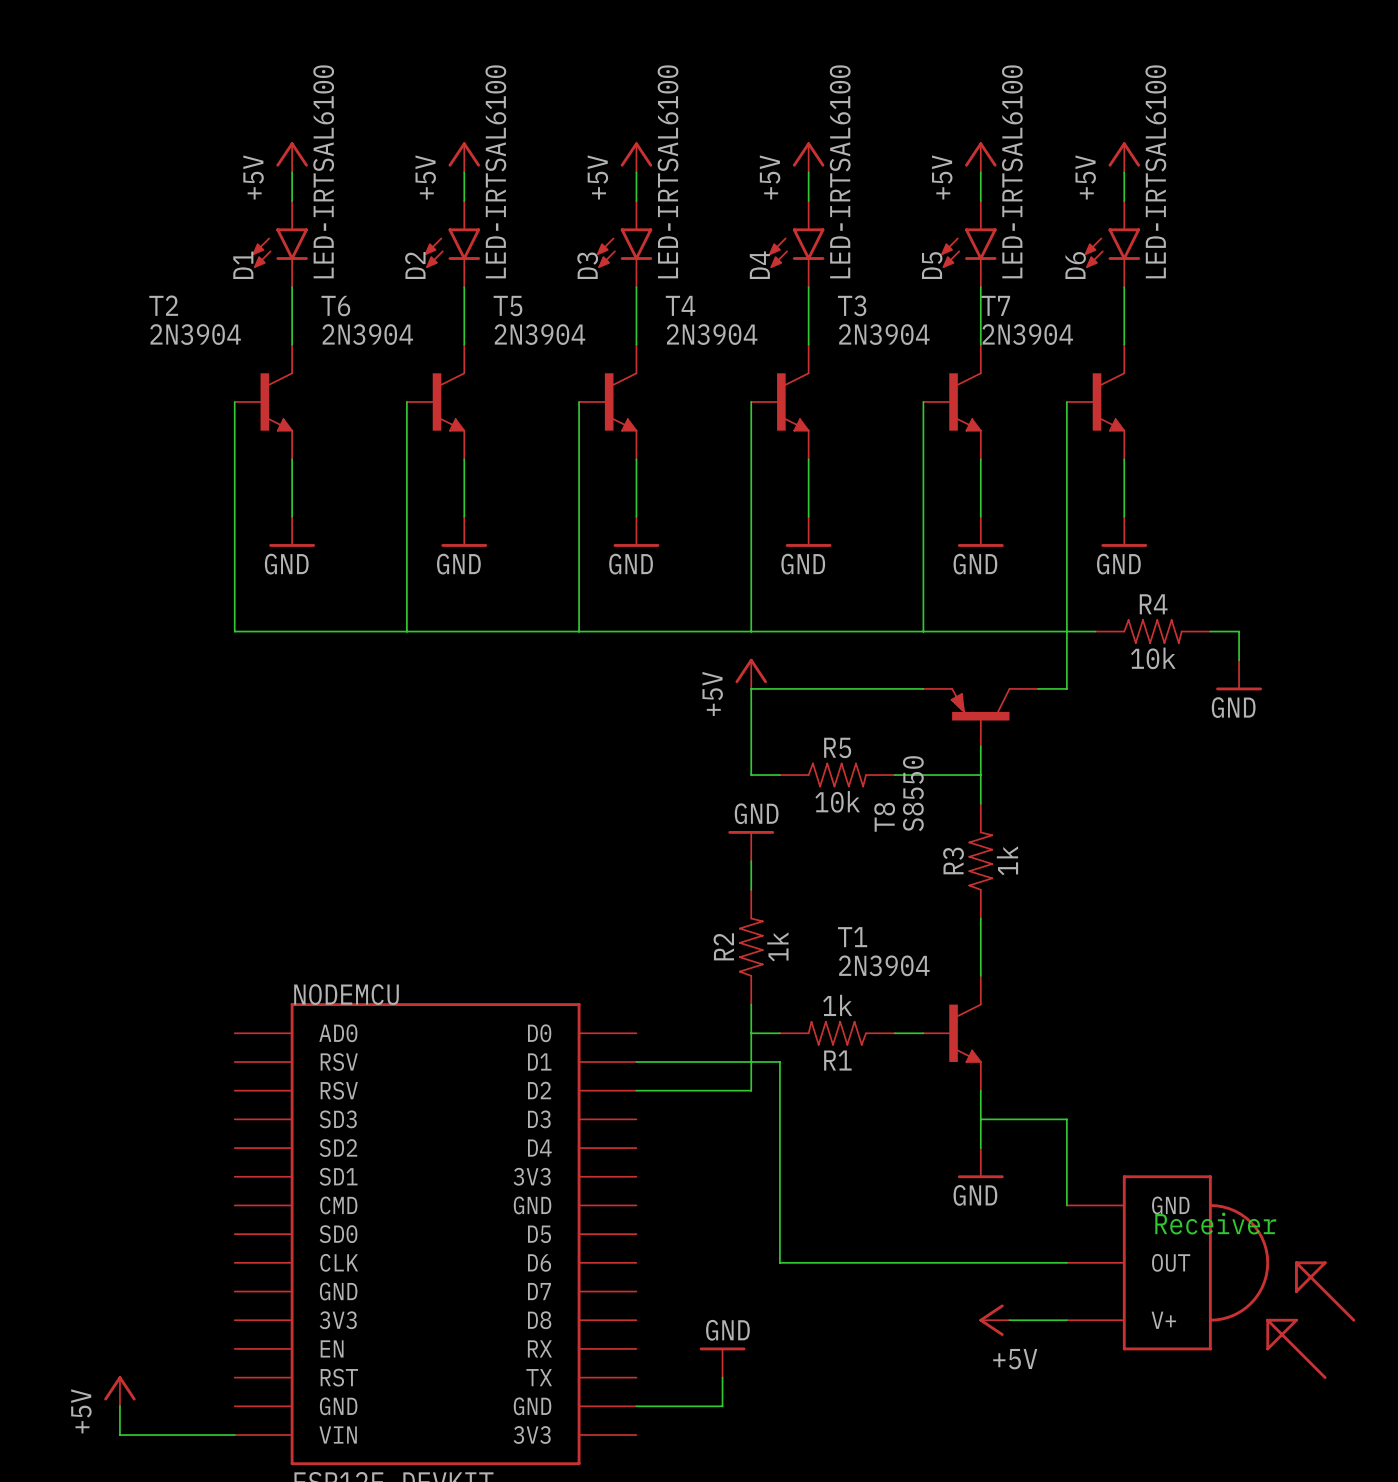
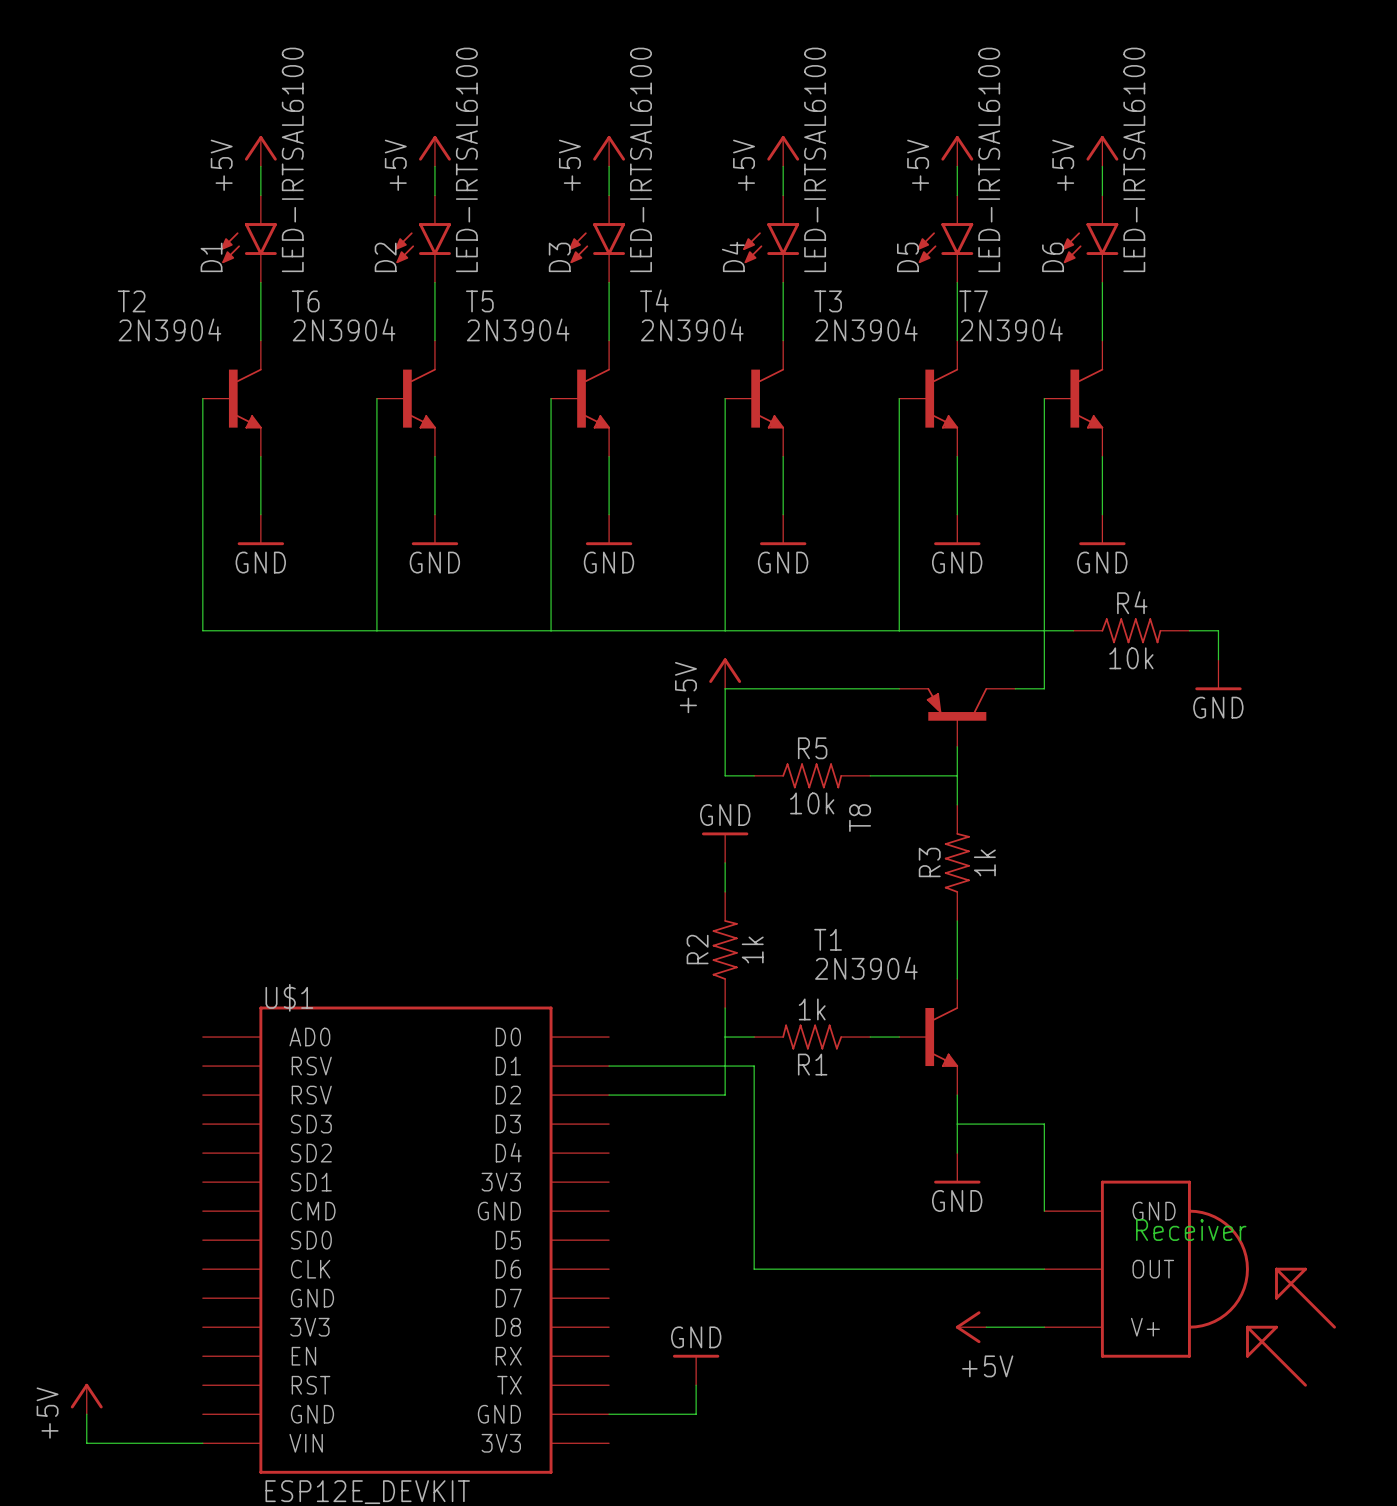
T8 value: S8550 (913, 793) -> none
NODEMCU name: NODEMCU (346, 994) -> U$1 (289, 997)

